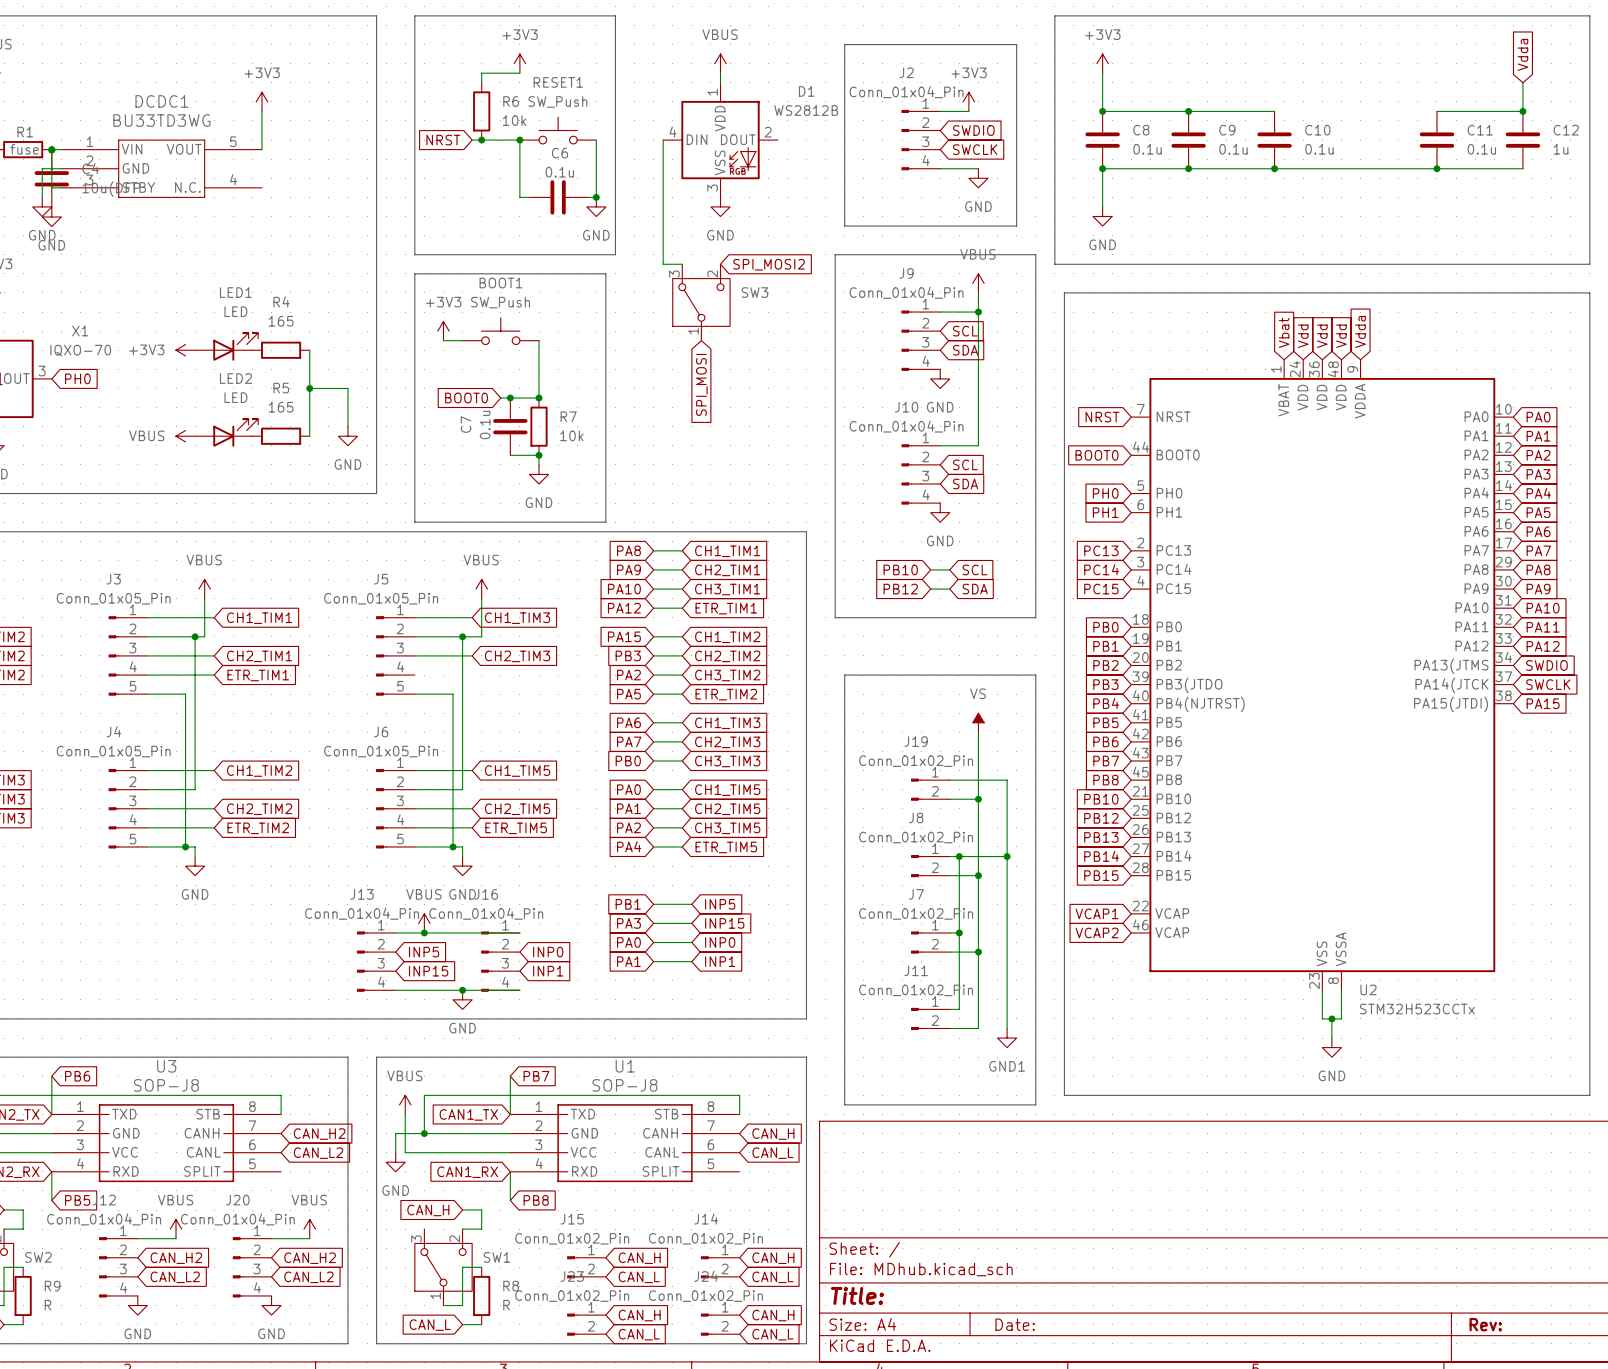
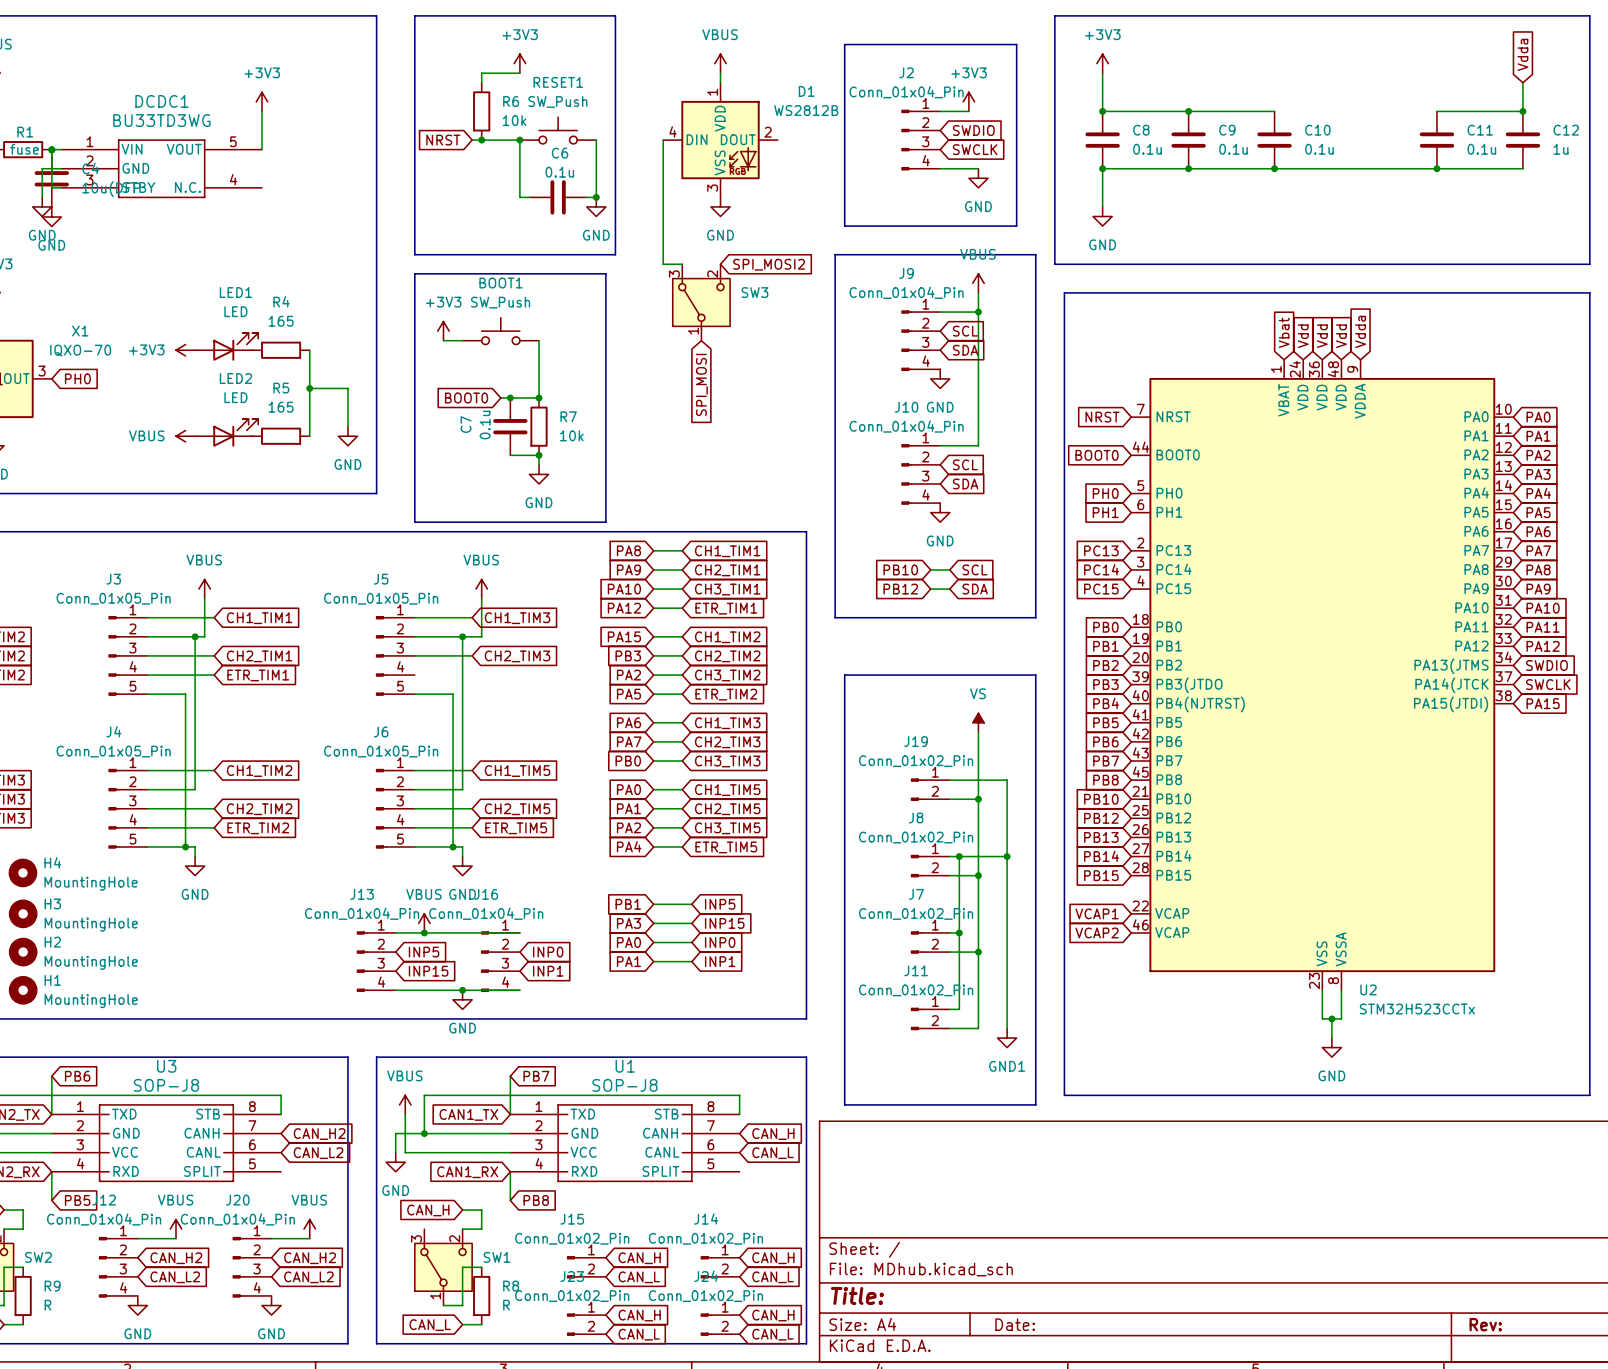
H4: none -> MountingHole (22, 872)
H3: none -> MountingHole (23, 913)
H2: none -> MountingHole (23, 952)
H1: none -> MountingHole (23, 990)

